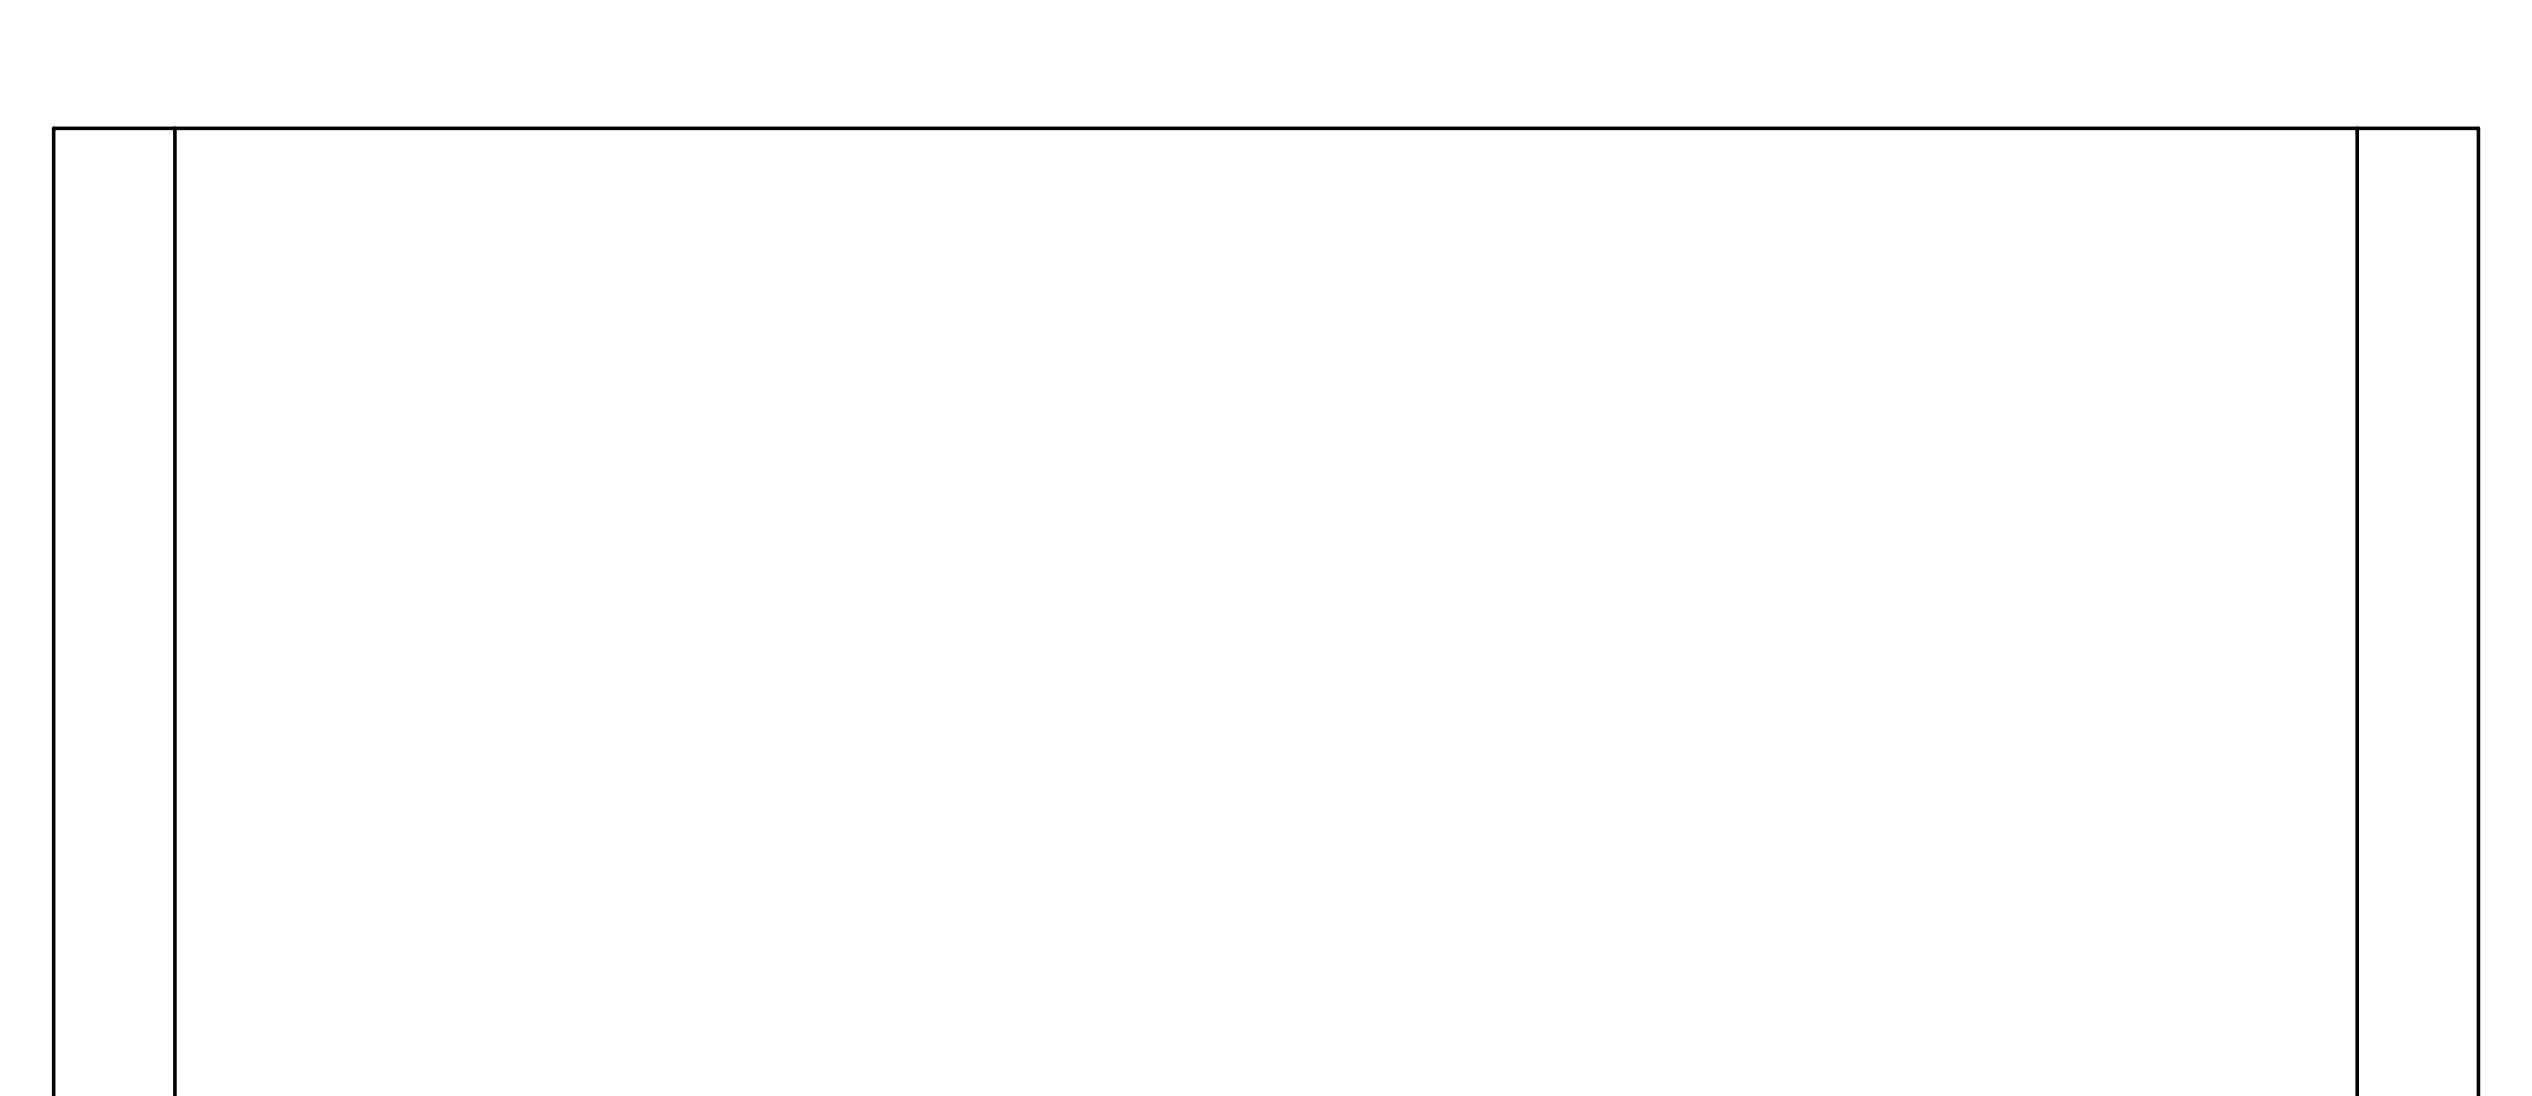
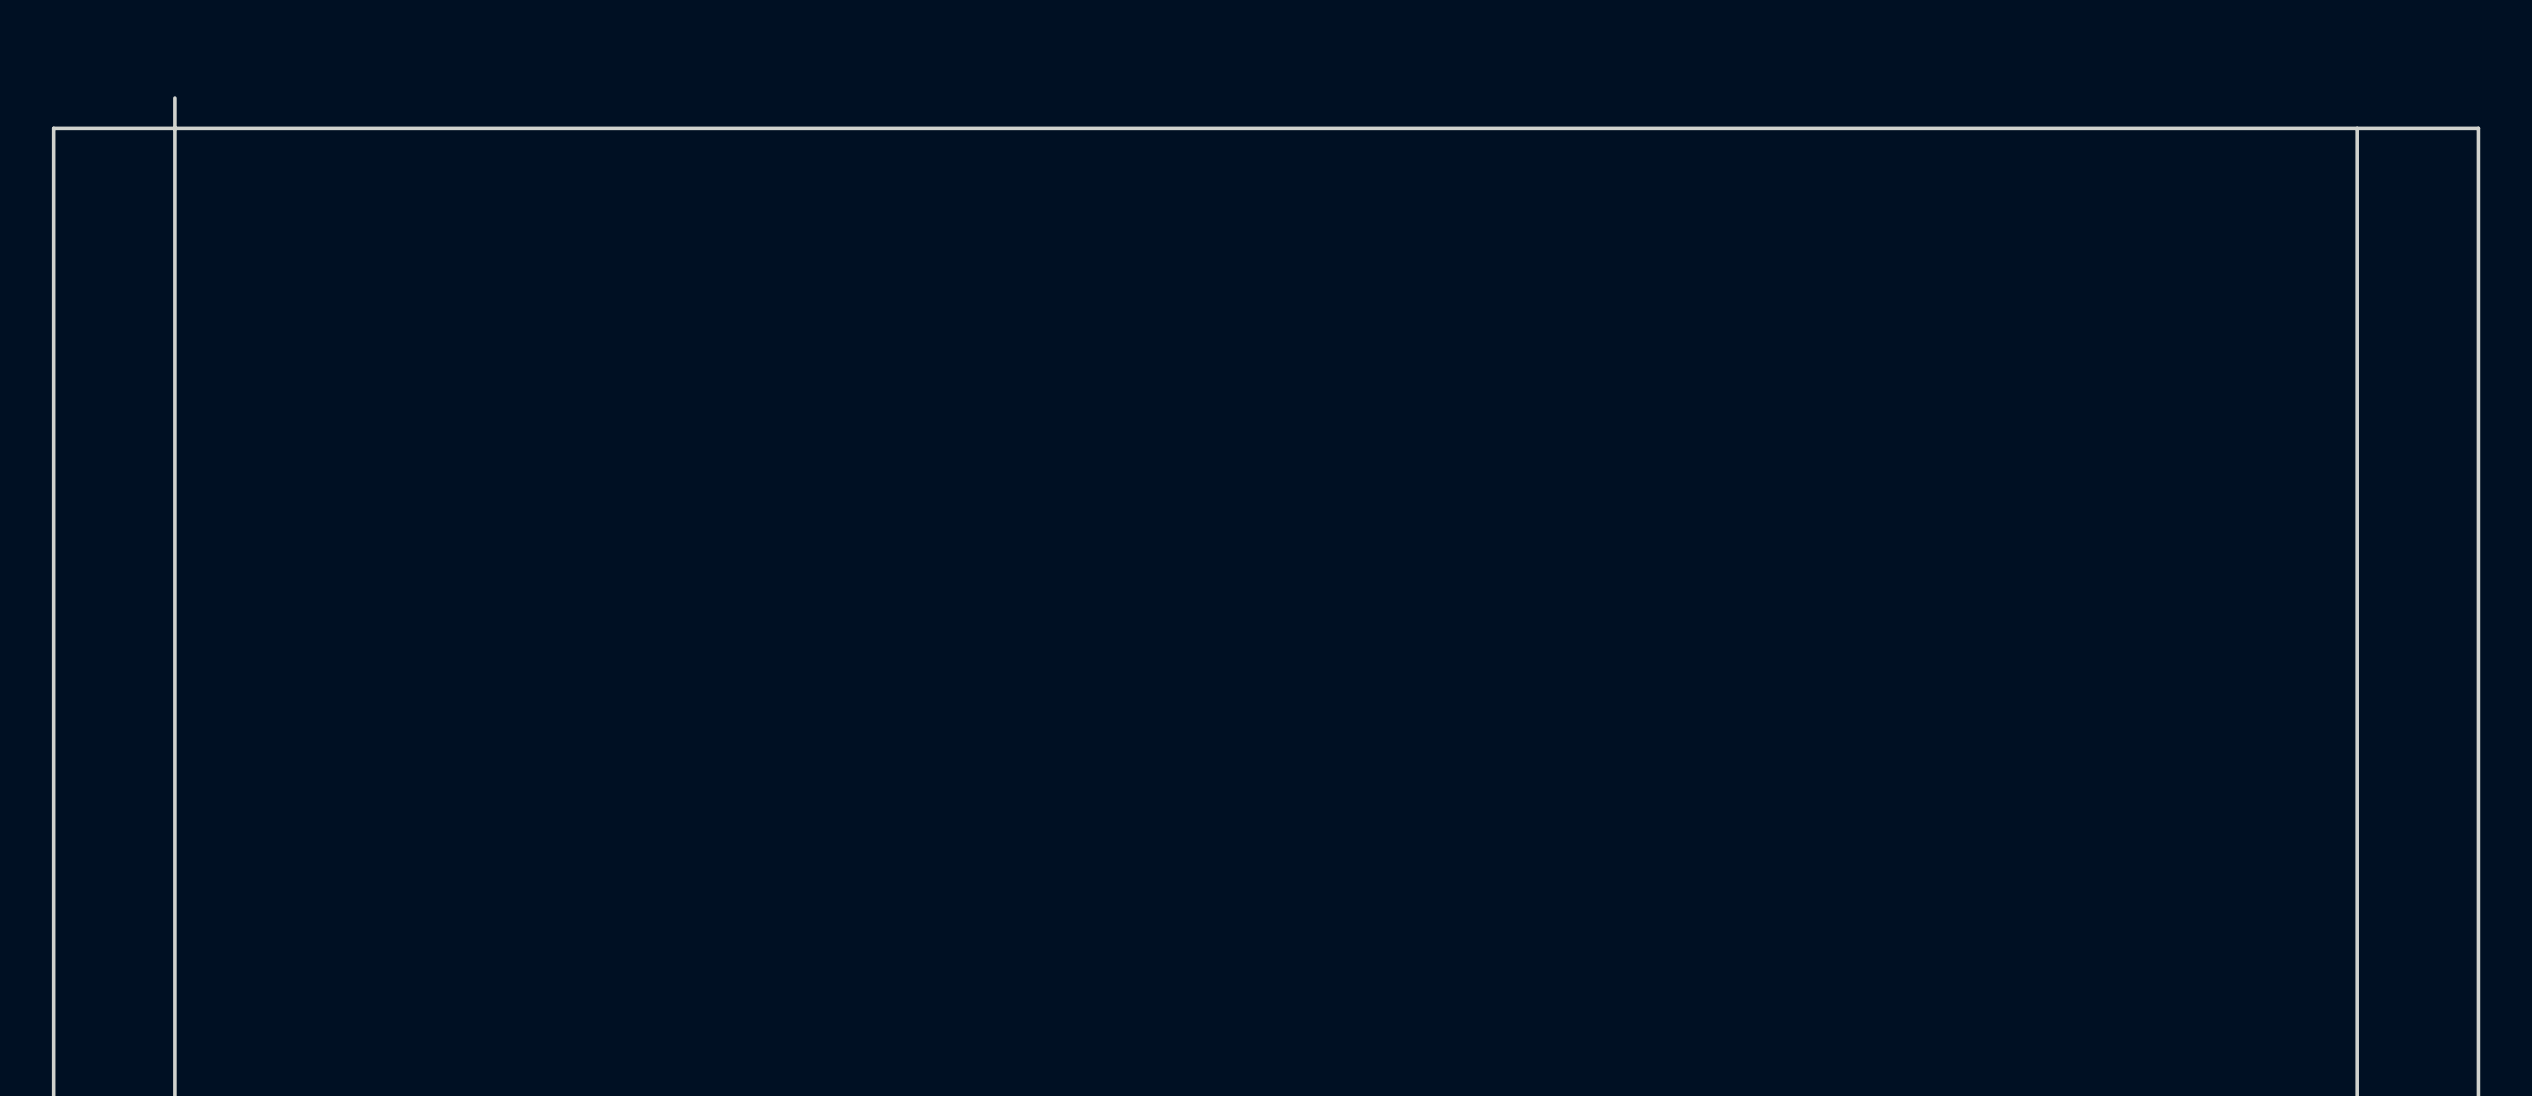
board edge: none -> (174, 98) (174, 128)

